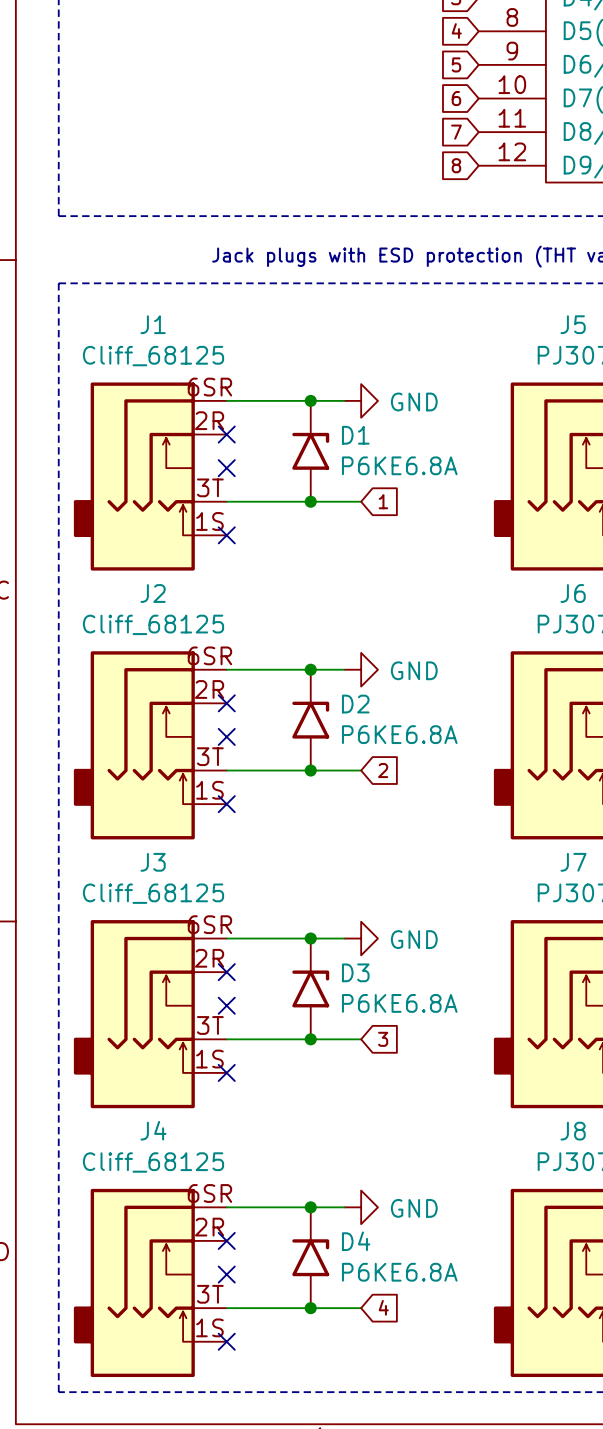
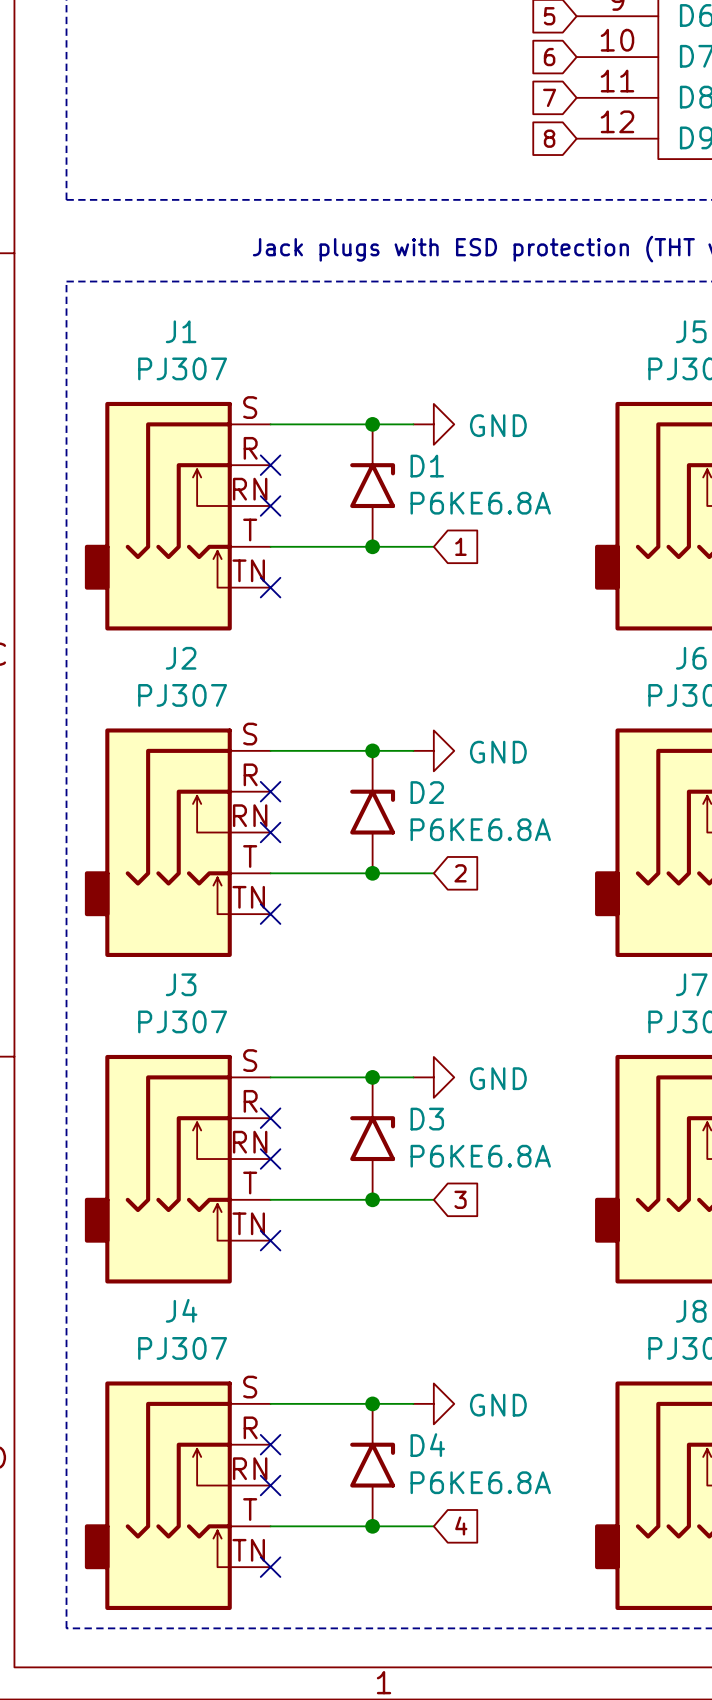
J1 value: Cliff_68125 (153, 356) -> PJ307 (182, 368)
J1 symbol: [73, 382, 227, 571] -> [84, 401, 271, 631]
J2 value: Cliff_68125 (153, 624) -> PJ307 (182, 695)
J2 symbol: [73, 651, 227, 840] -> [84, 728, 271, 957]
J3 value: Cliff_68125 (153, 893) -> PJ307 (182, 1021)
J3 symbol: [73, 920, 227, 1109] -> [84, 1054, 271, 1284]
J4 value: Cliff_68125 (153, 1162) -> PJ307 (182, 1348)
J4 symbol: [73, 1188, 227, 1378] -> [84, 1381, 271, 1611]

